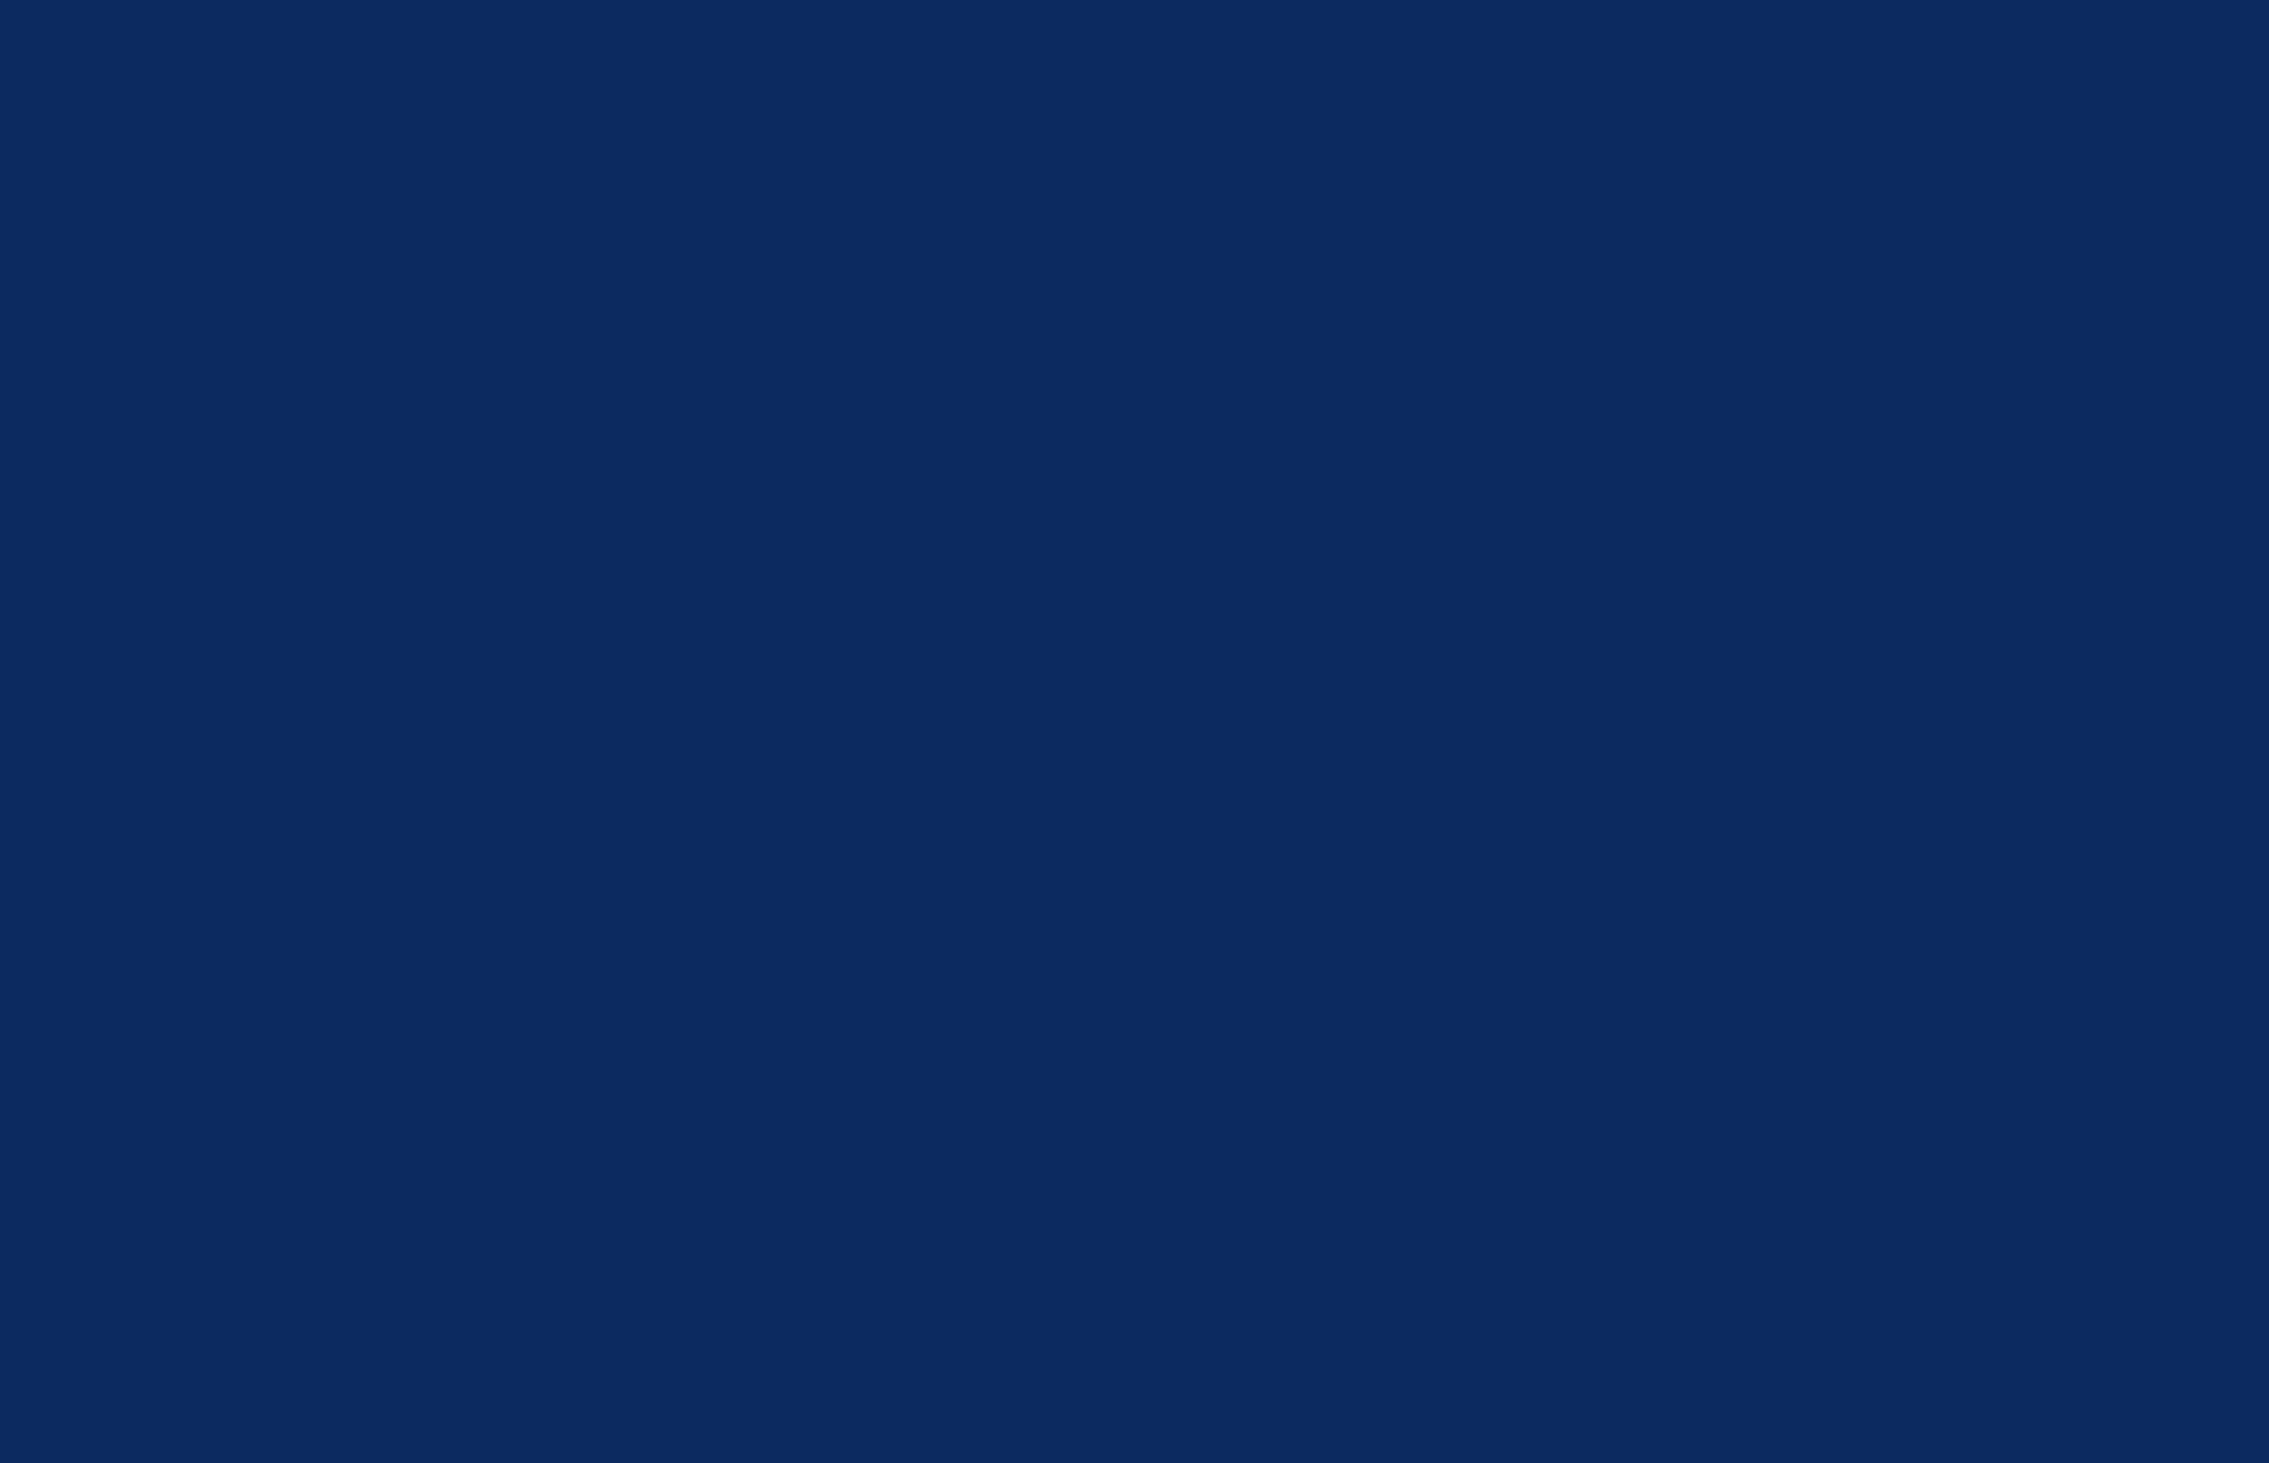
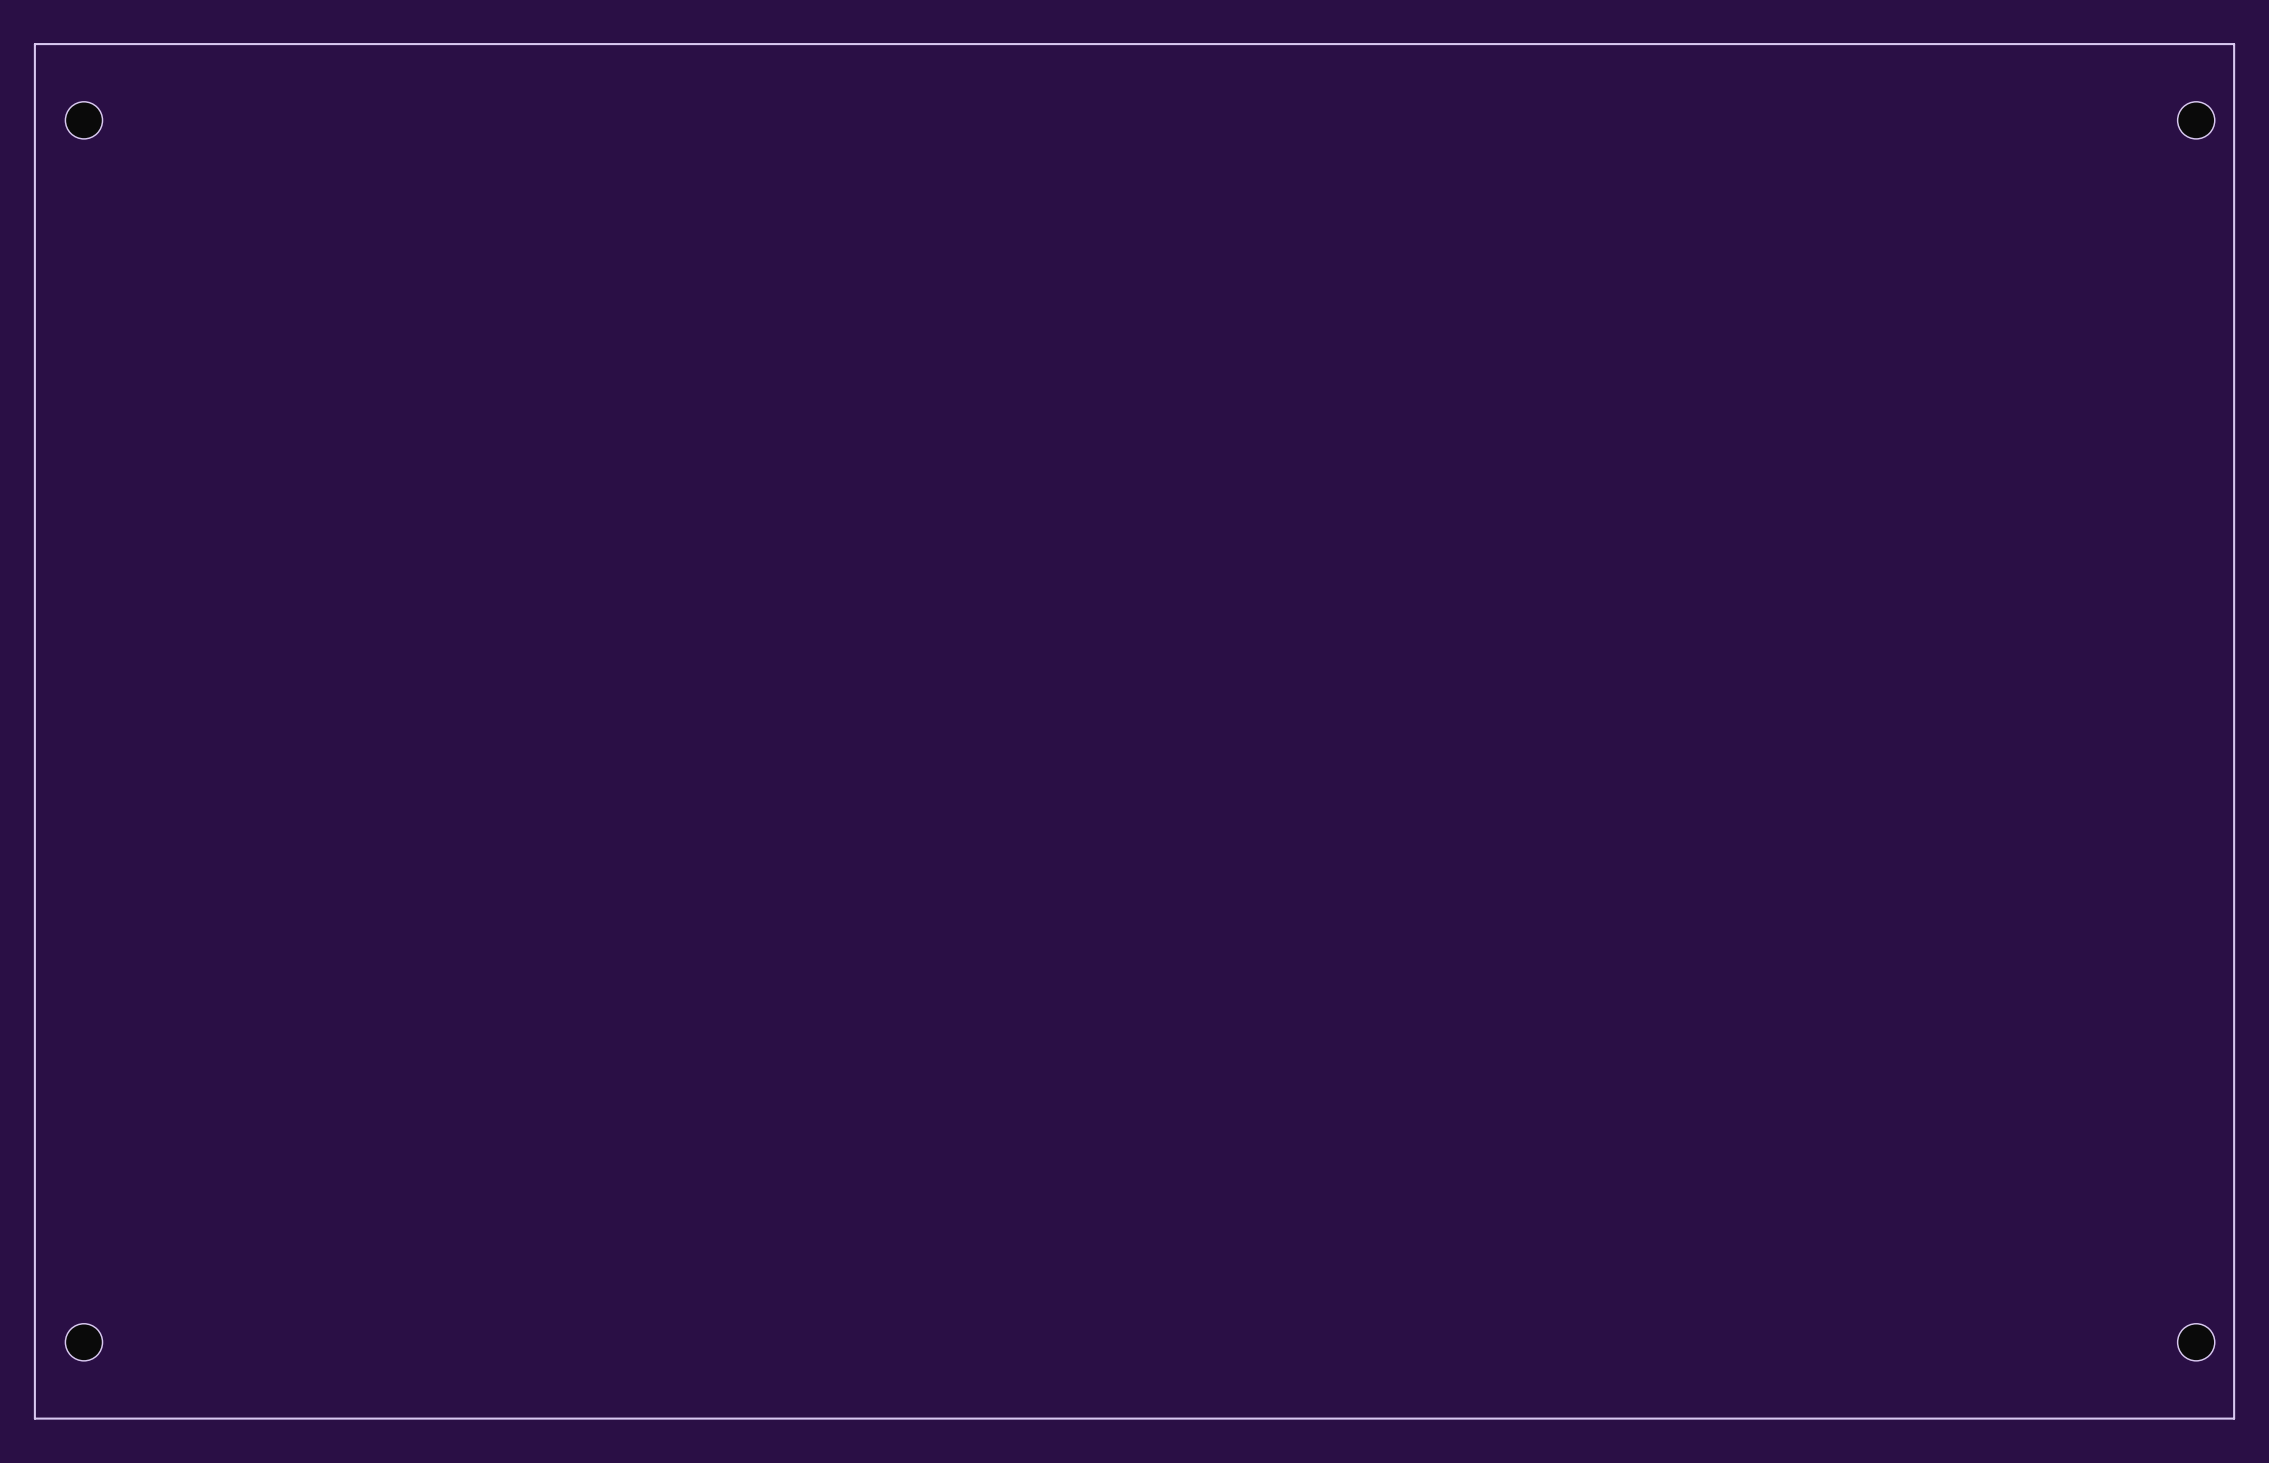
board edge: none -> (34, 44) (2234, 44) (2234, 1418) (34, 1418) (34, 44)
part: none -> (83, 120)
part: none -> (2196, 120)
part: none -> (83, 1342)
part: none -> (2196, 1342)

